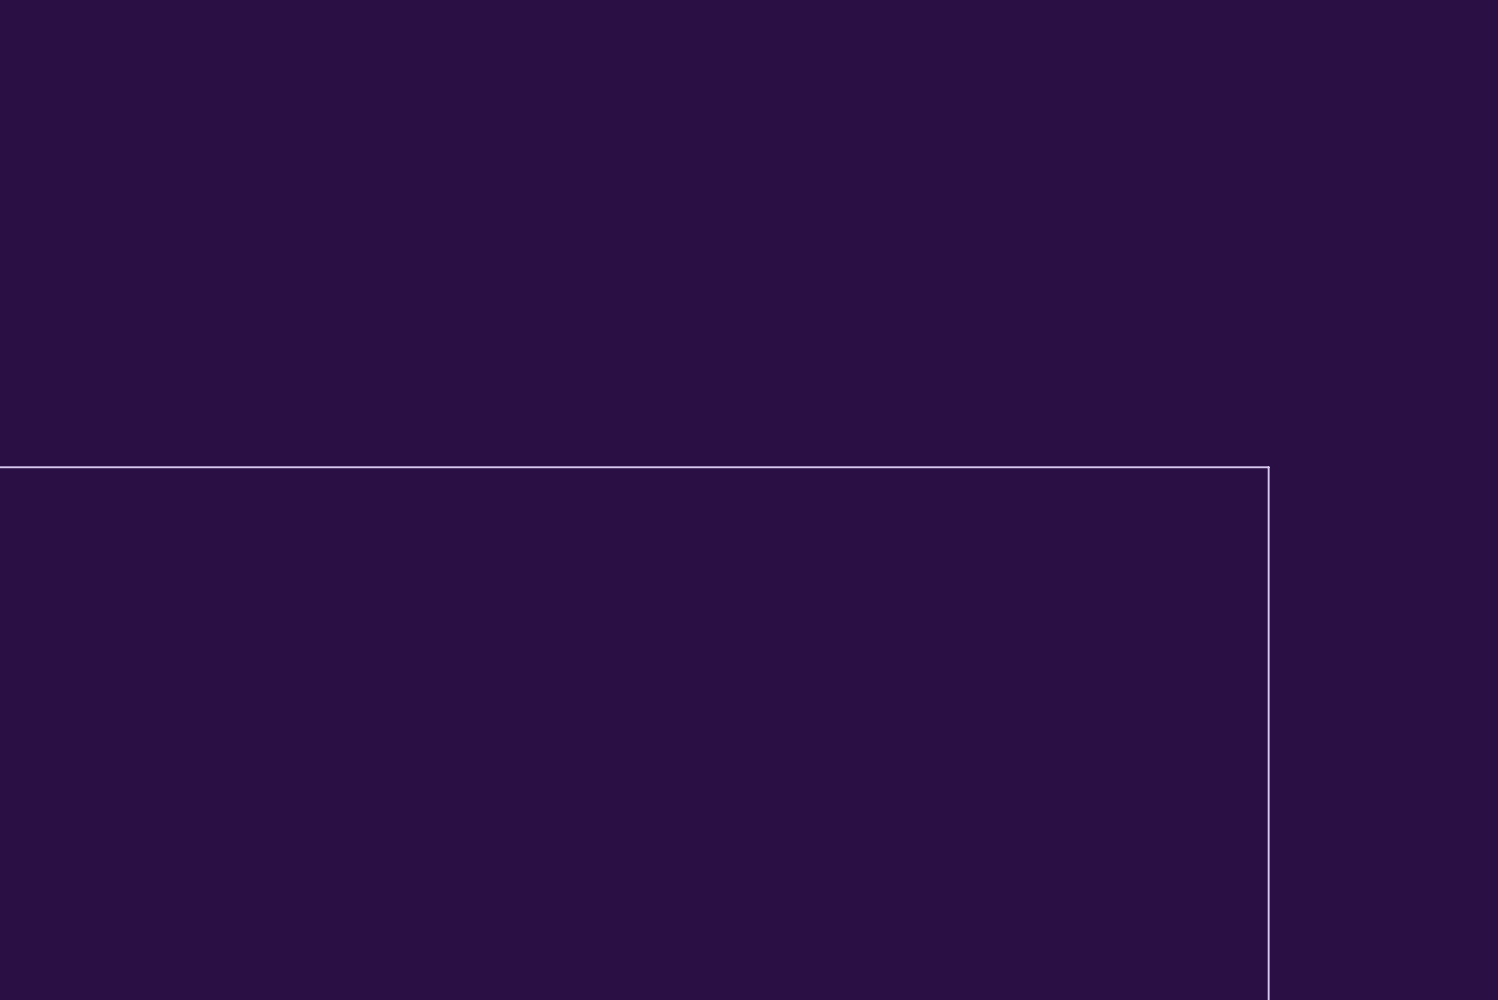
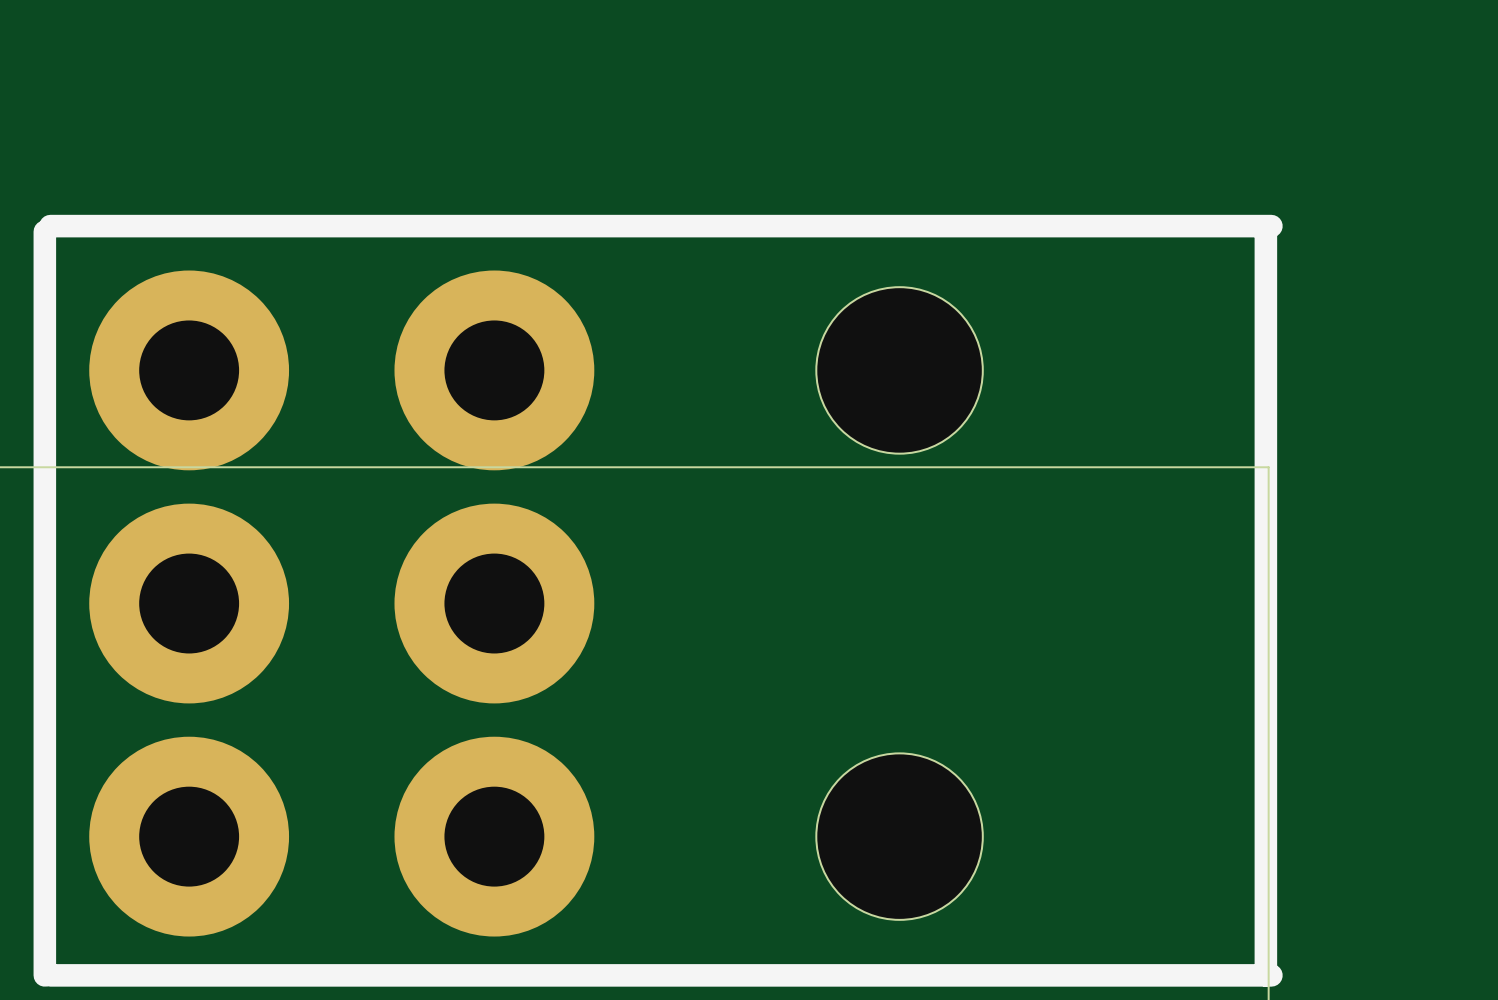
part: none -> (658, 600)

